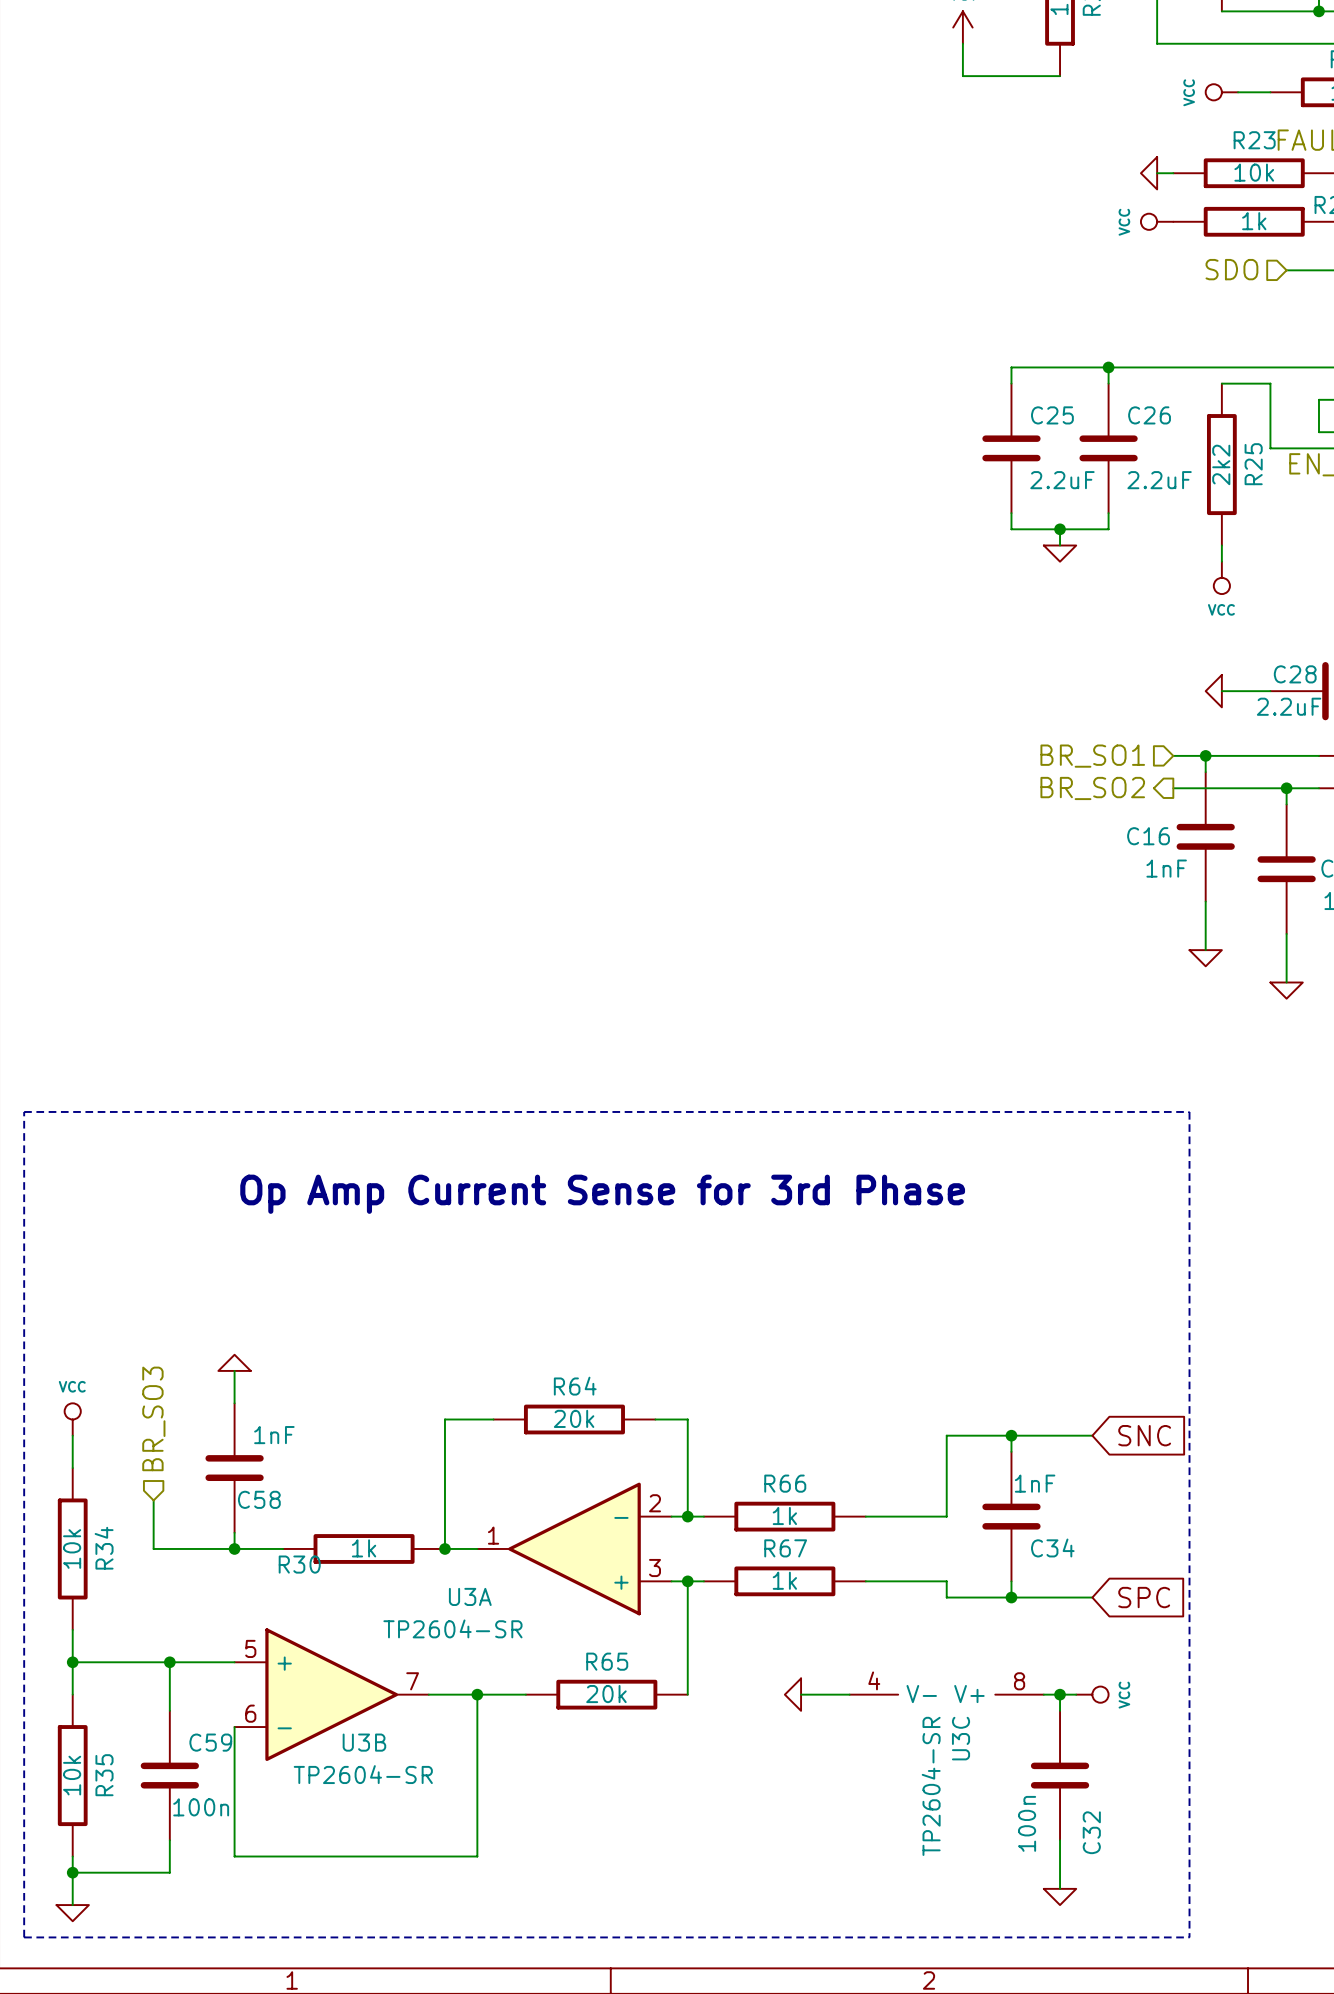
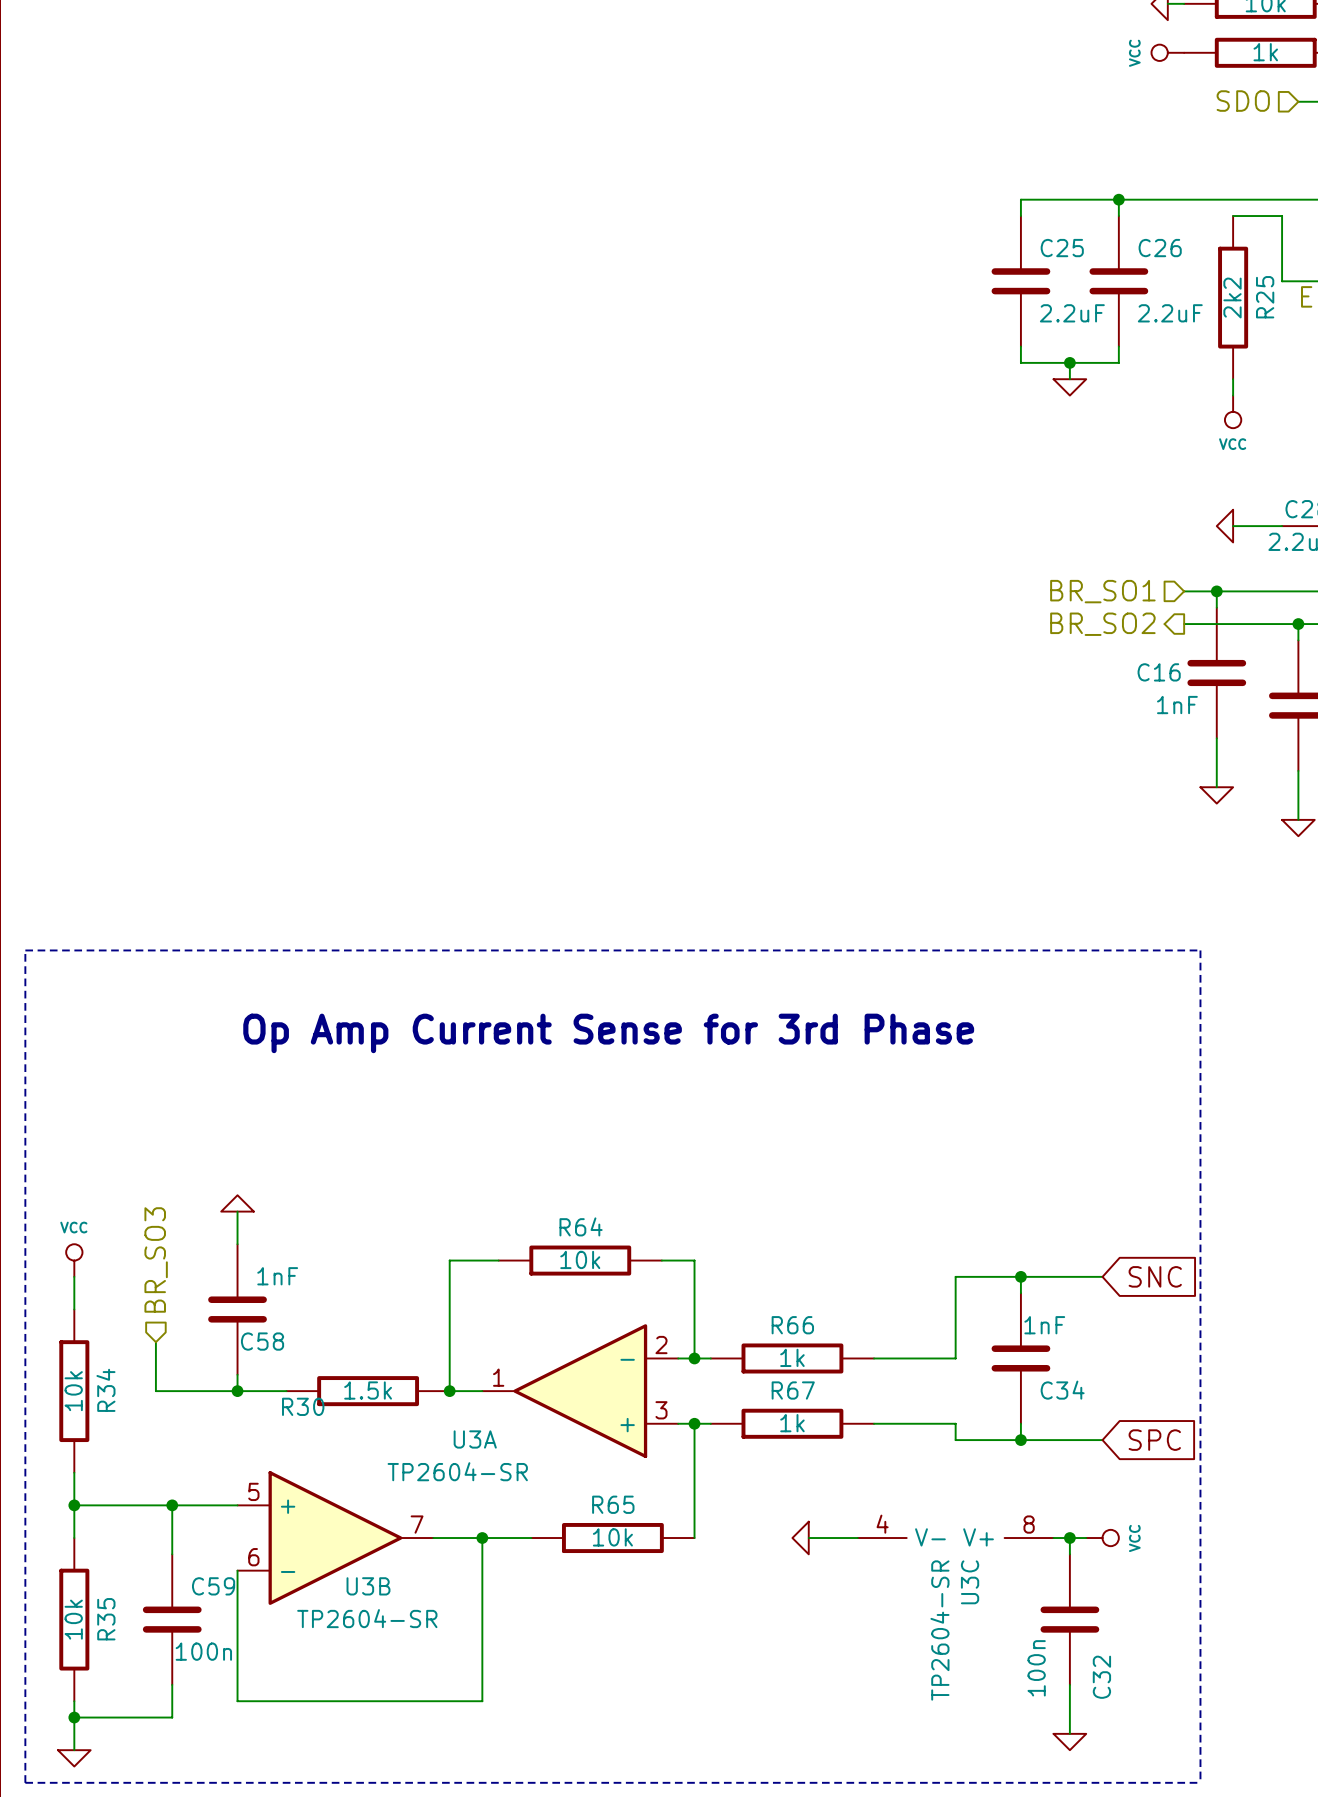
R64 value: 20k (574, 1418) -> 10k (580, 1259)
R30 value: 1k (364, 1548) -> 1.5k (368, 1390)
R65 value: 20k (606, 1694) -> 10k (612, 1537)

